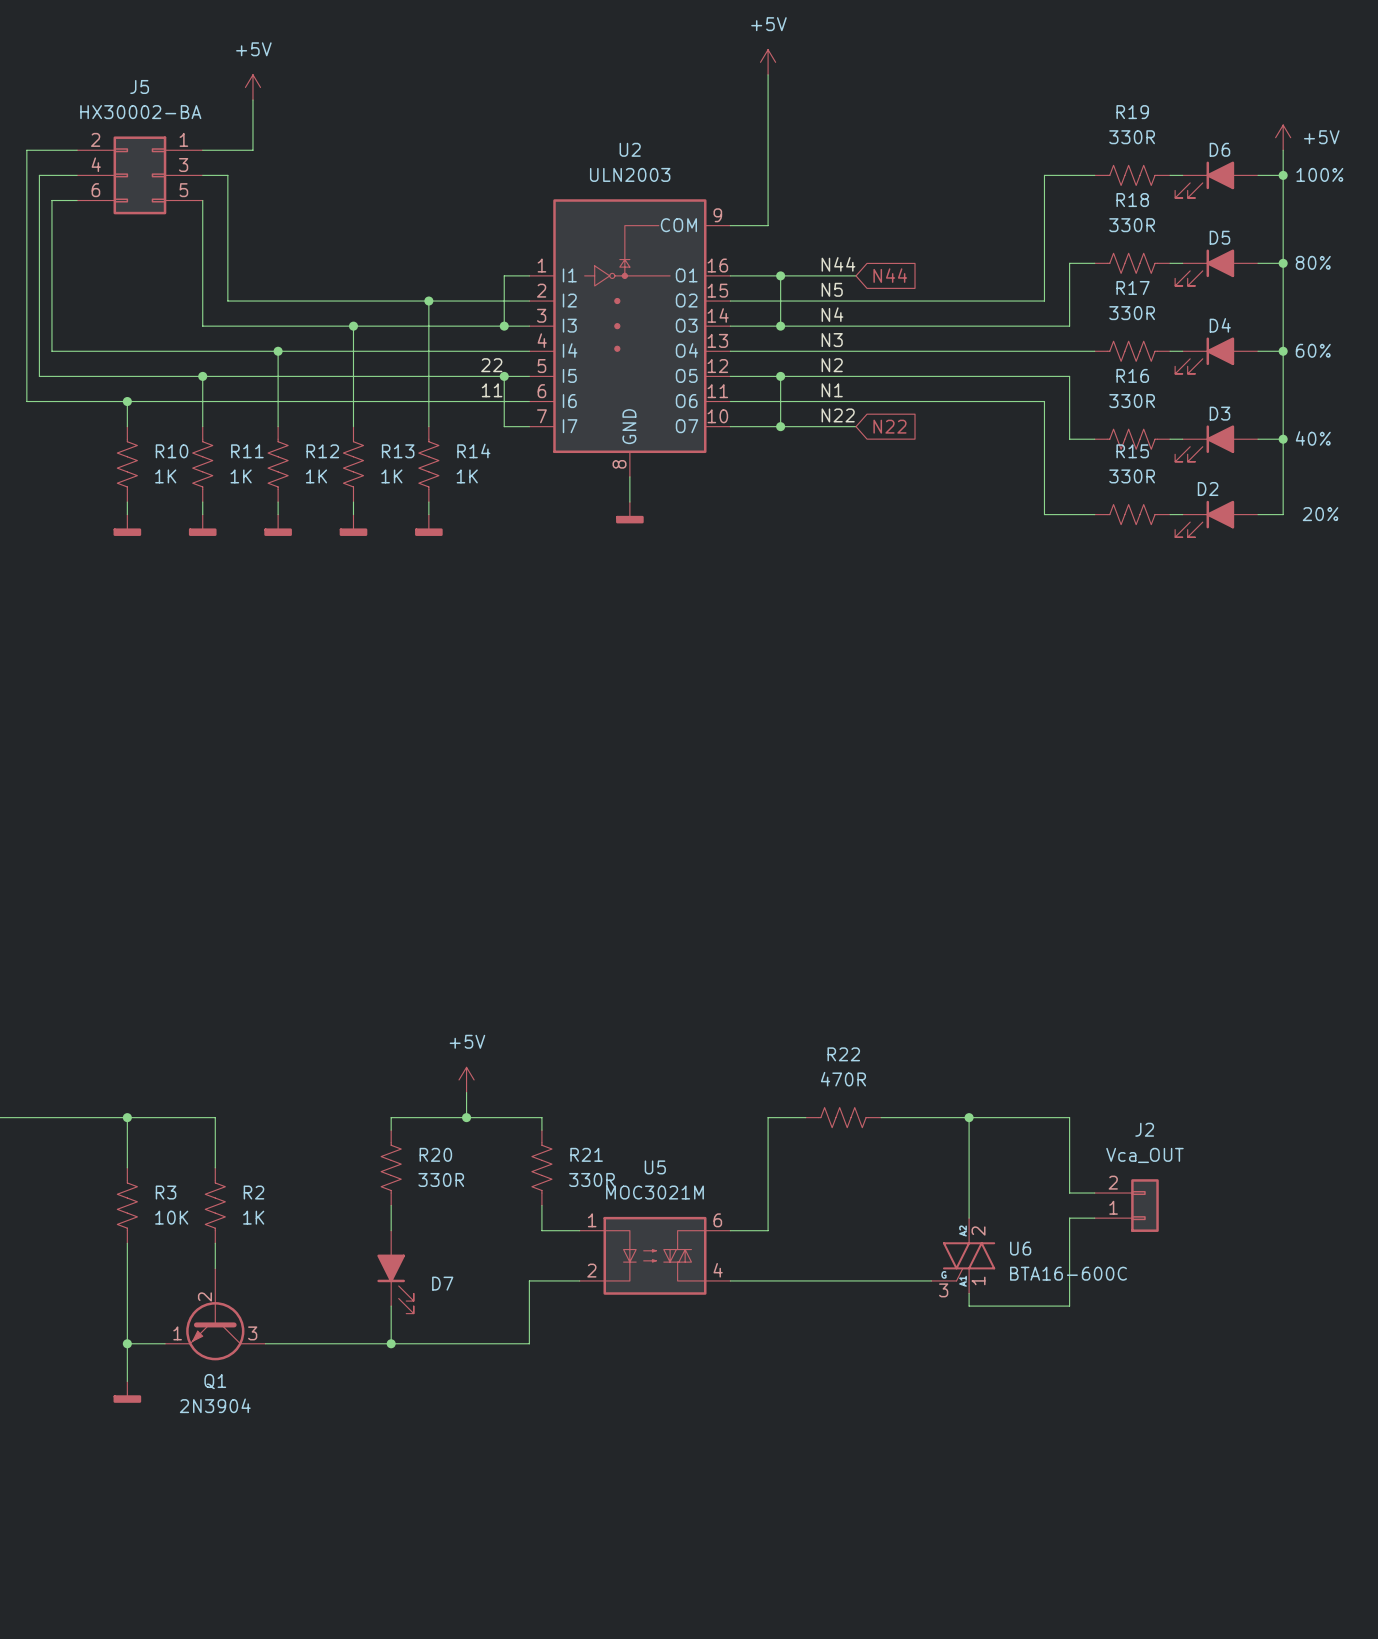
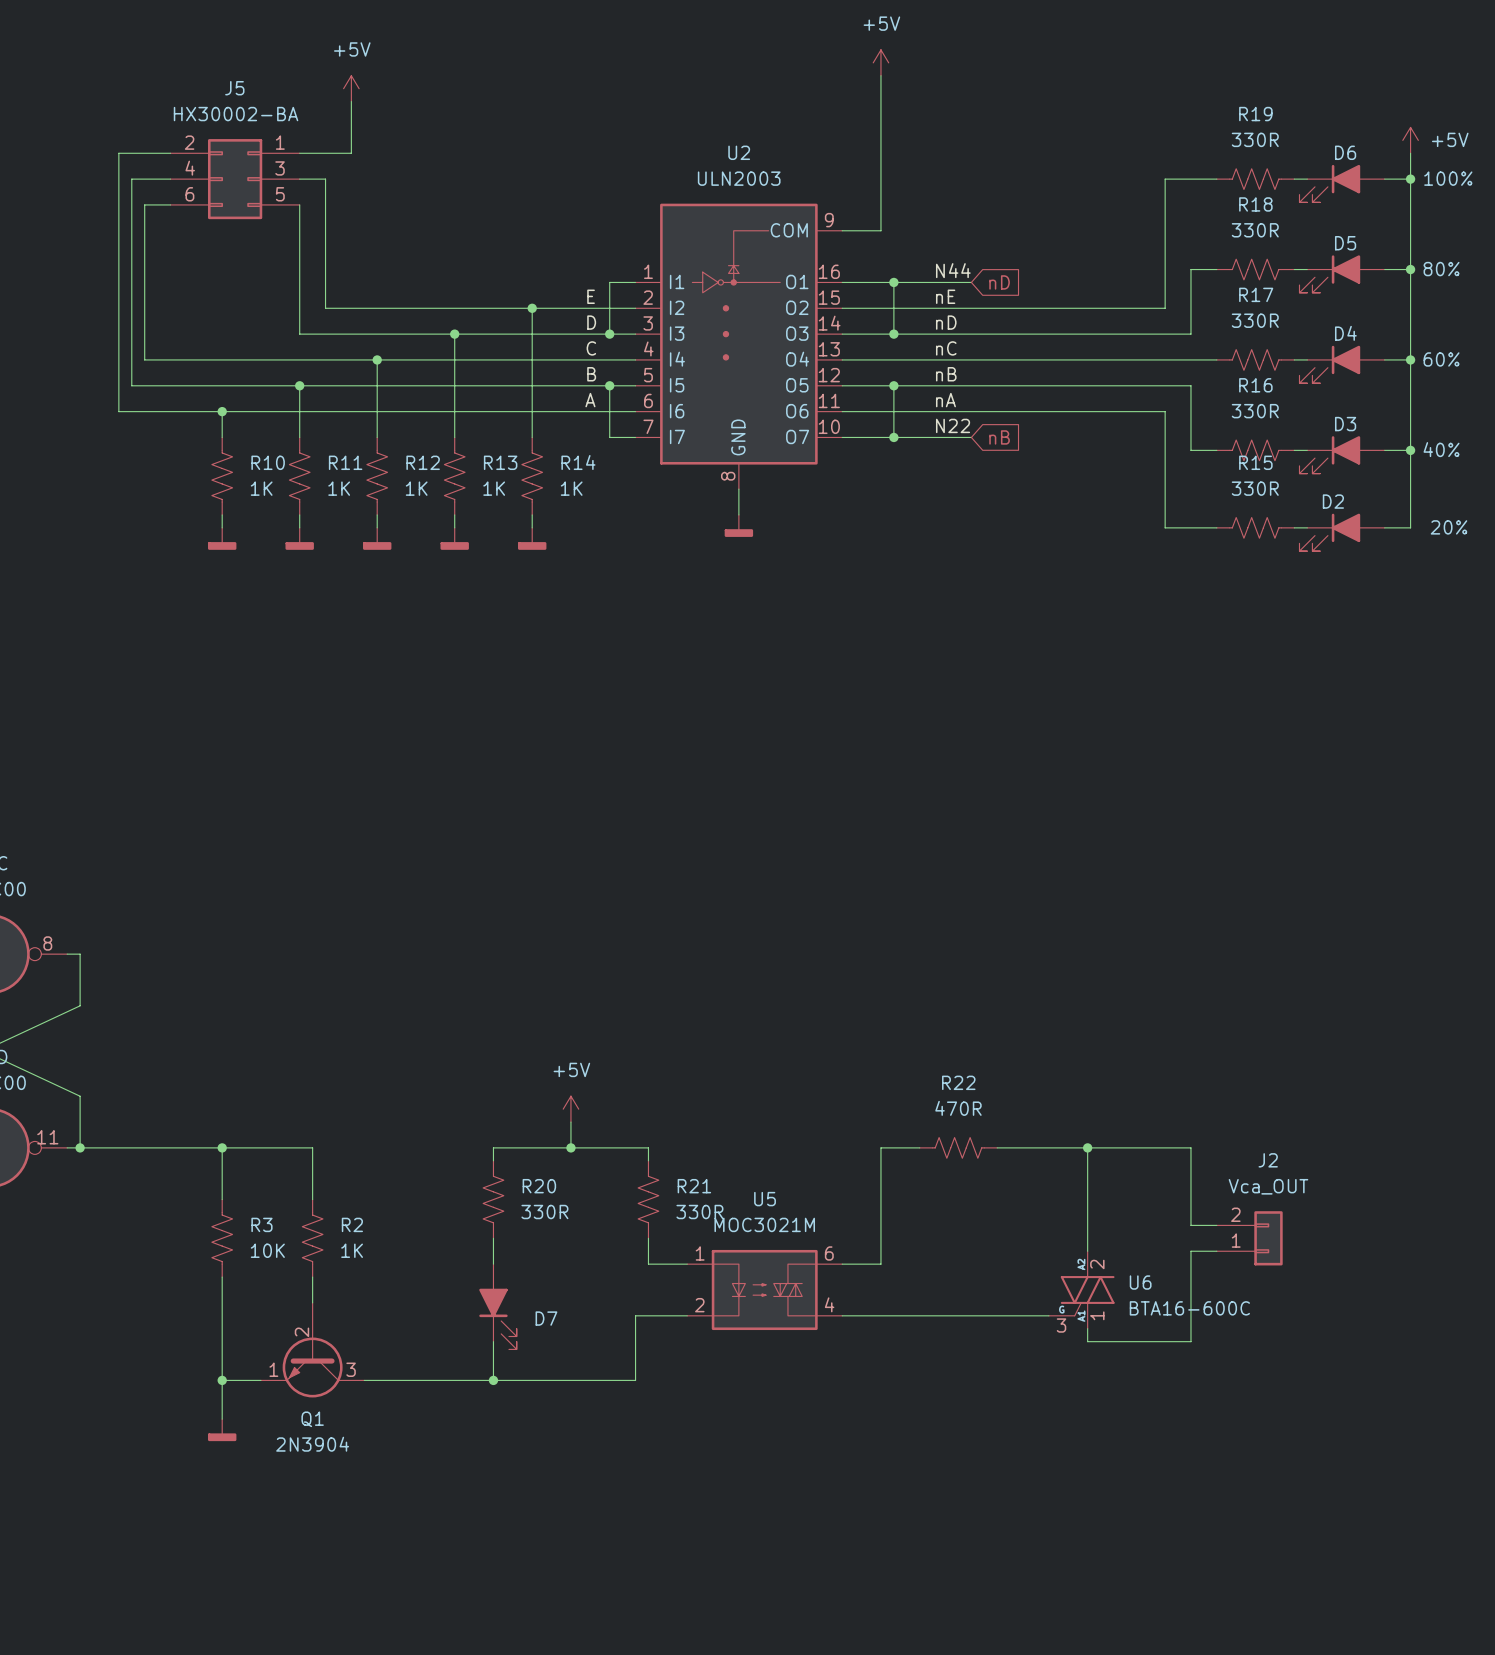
global label: N44 (890, 275) -> nD (999, 282)
label: none -> E (591, 296)
label: N5 (832, 289) -> nE (945, 296)
label: none -> D (591, 322)
label: N4 (832, 314) -> nD (946, 322)
label: none -> C (591, 348)
label: N3 (832, 340) -> nC (946, 348)
label: 22 (491, 365) -> B (591, 374)
label: N2 (832, 365) -> nB (946, 374)
label: 11 (492, 390) -> A (590, 400)
label: N1 (832, 390) -> nA (945, 400)
global label: N22 (889, 426) -> nB (999, 437)

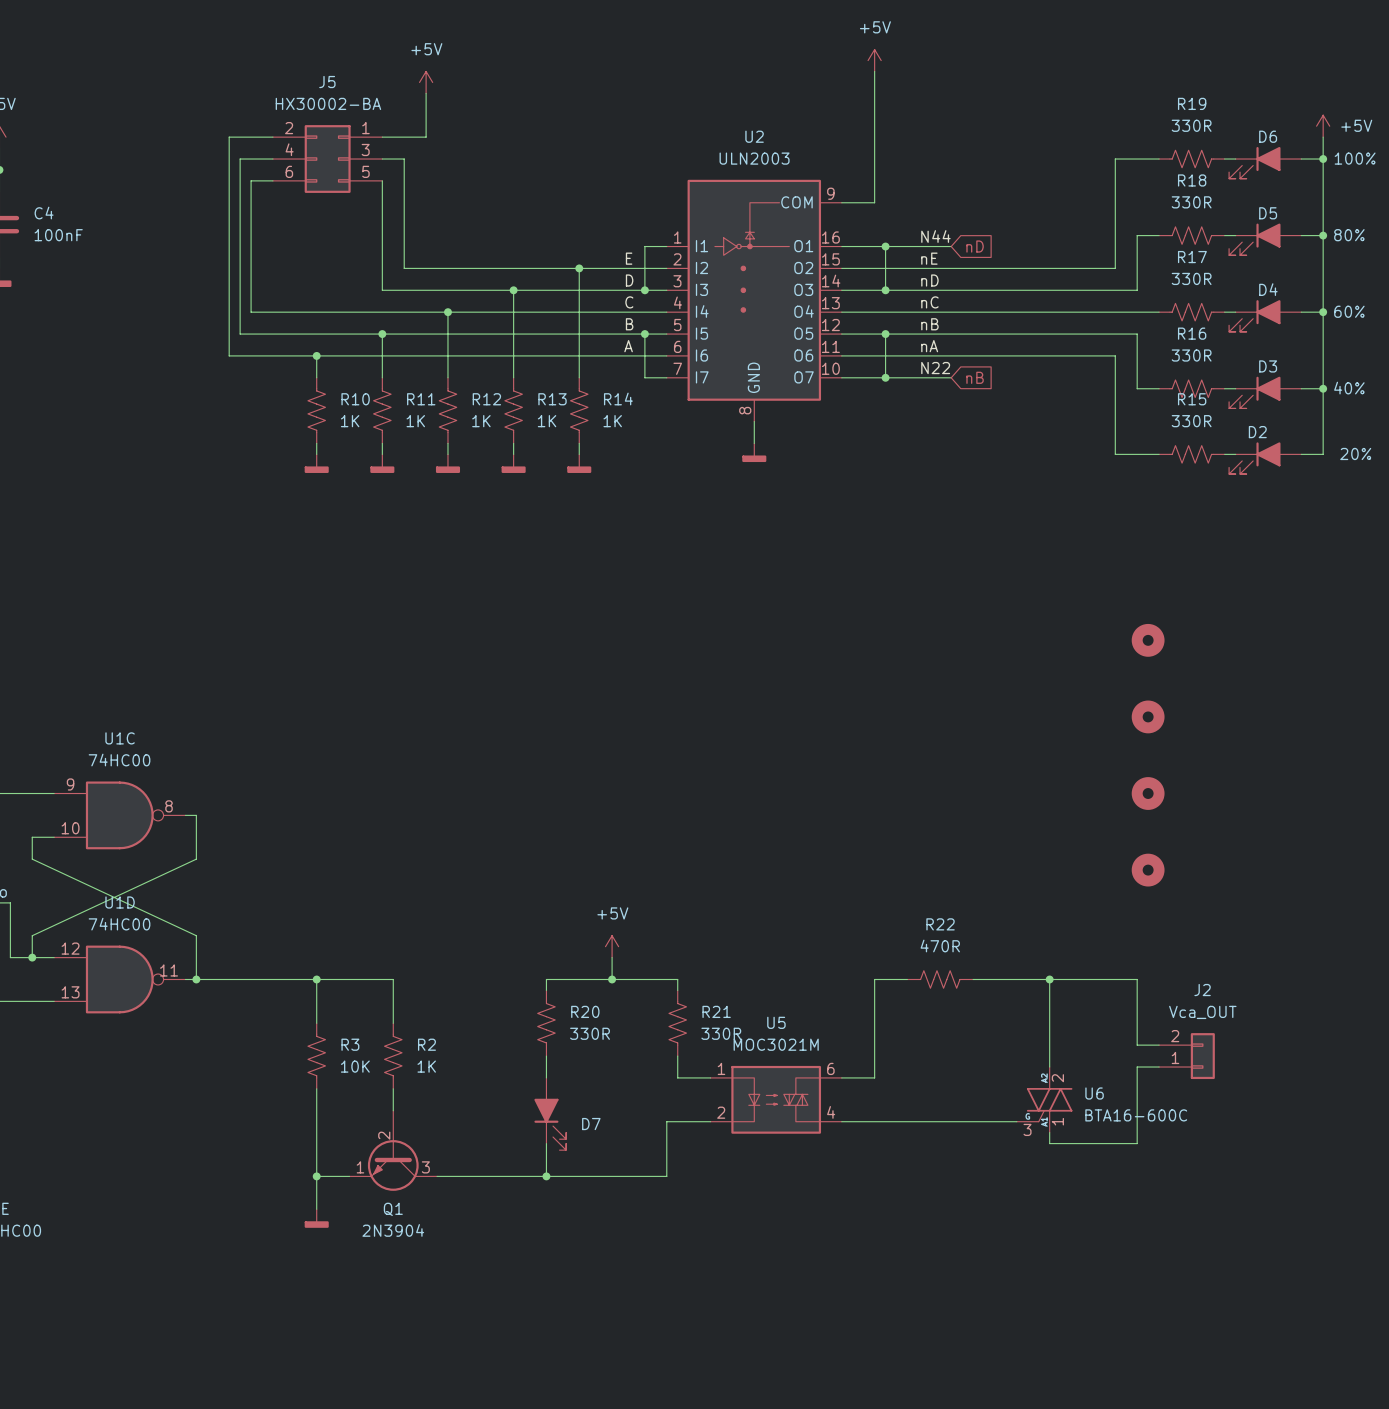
part: none -> (1148, 640)
part: none -> (1148, 716)
part: none -> (1148, 793)
part: none -> (1148, 870)

